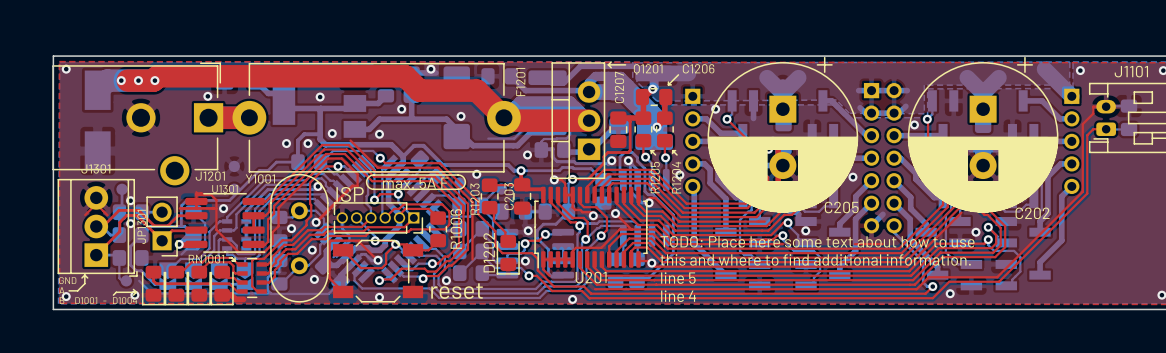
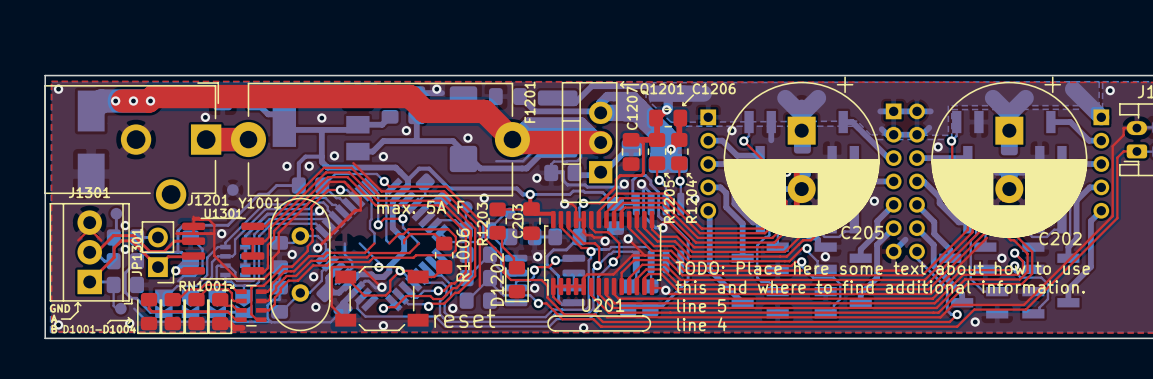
line: (373, 175) (459, 175) (463, 177) (465, 183) (459, 189) (372, 189) (368, 186) (366, 181) (369, 176) (373, 175) -> (555, 316) (643, 316) (648, 318) (650, 324) (648, 328) (643, 330) (554, 330) (549, 328) (548, 322) (550, 318) (555, 316)
part: ISP (378, 217) -> none

